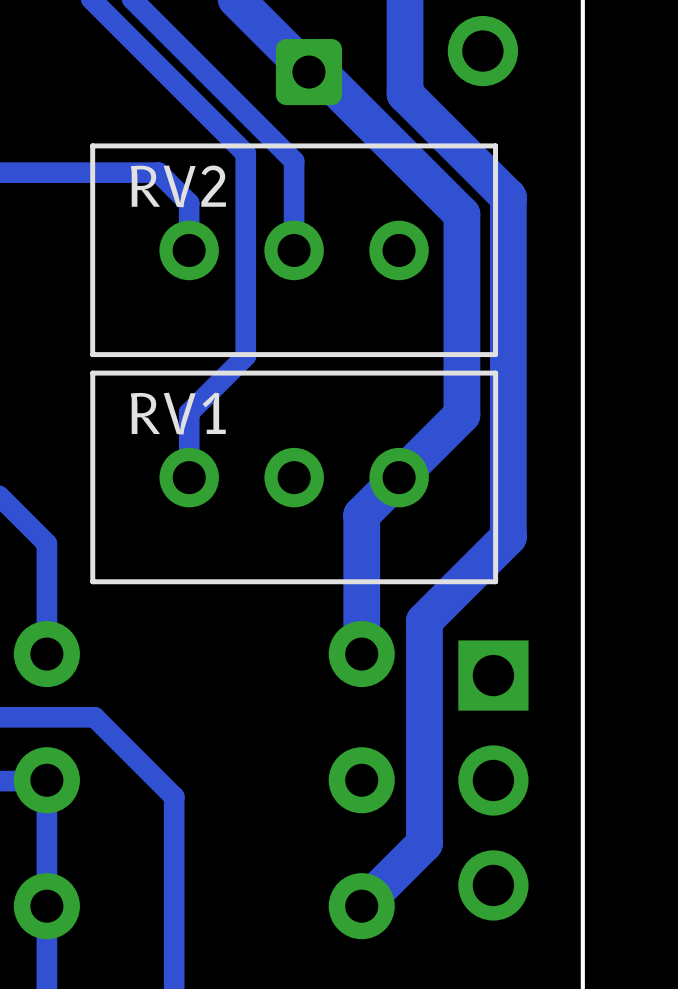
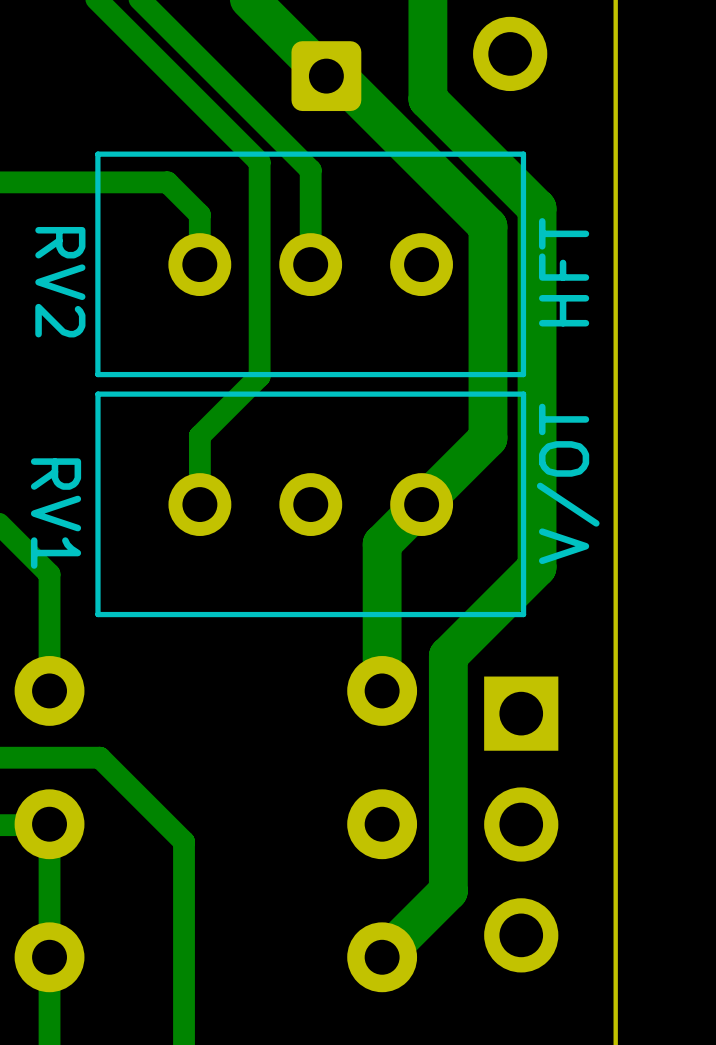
RV2 name rotation: 0° (178, 186) -> 90° clockwise (60, 282)
RV2 name position: RV2 (178, 186) -> RV2 (60, 282)
text: none -> HFT (564, 272)
RV1 name rotation: 0° (178, 413) -> 90° clockwise (56, 513)
RV1 name position: RV1 (178, 413) -> RV1 (56, 513)
text: none -> V/OT (568, 483)

